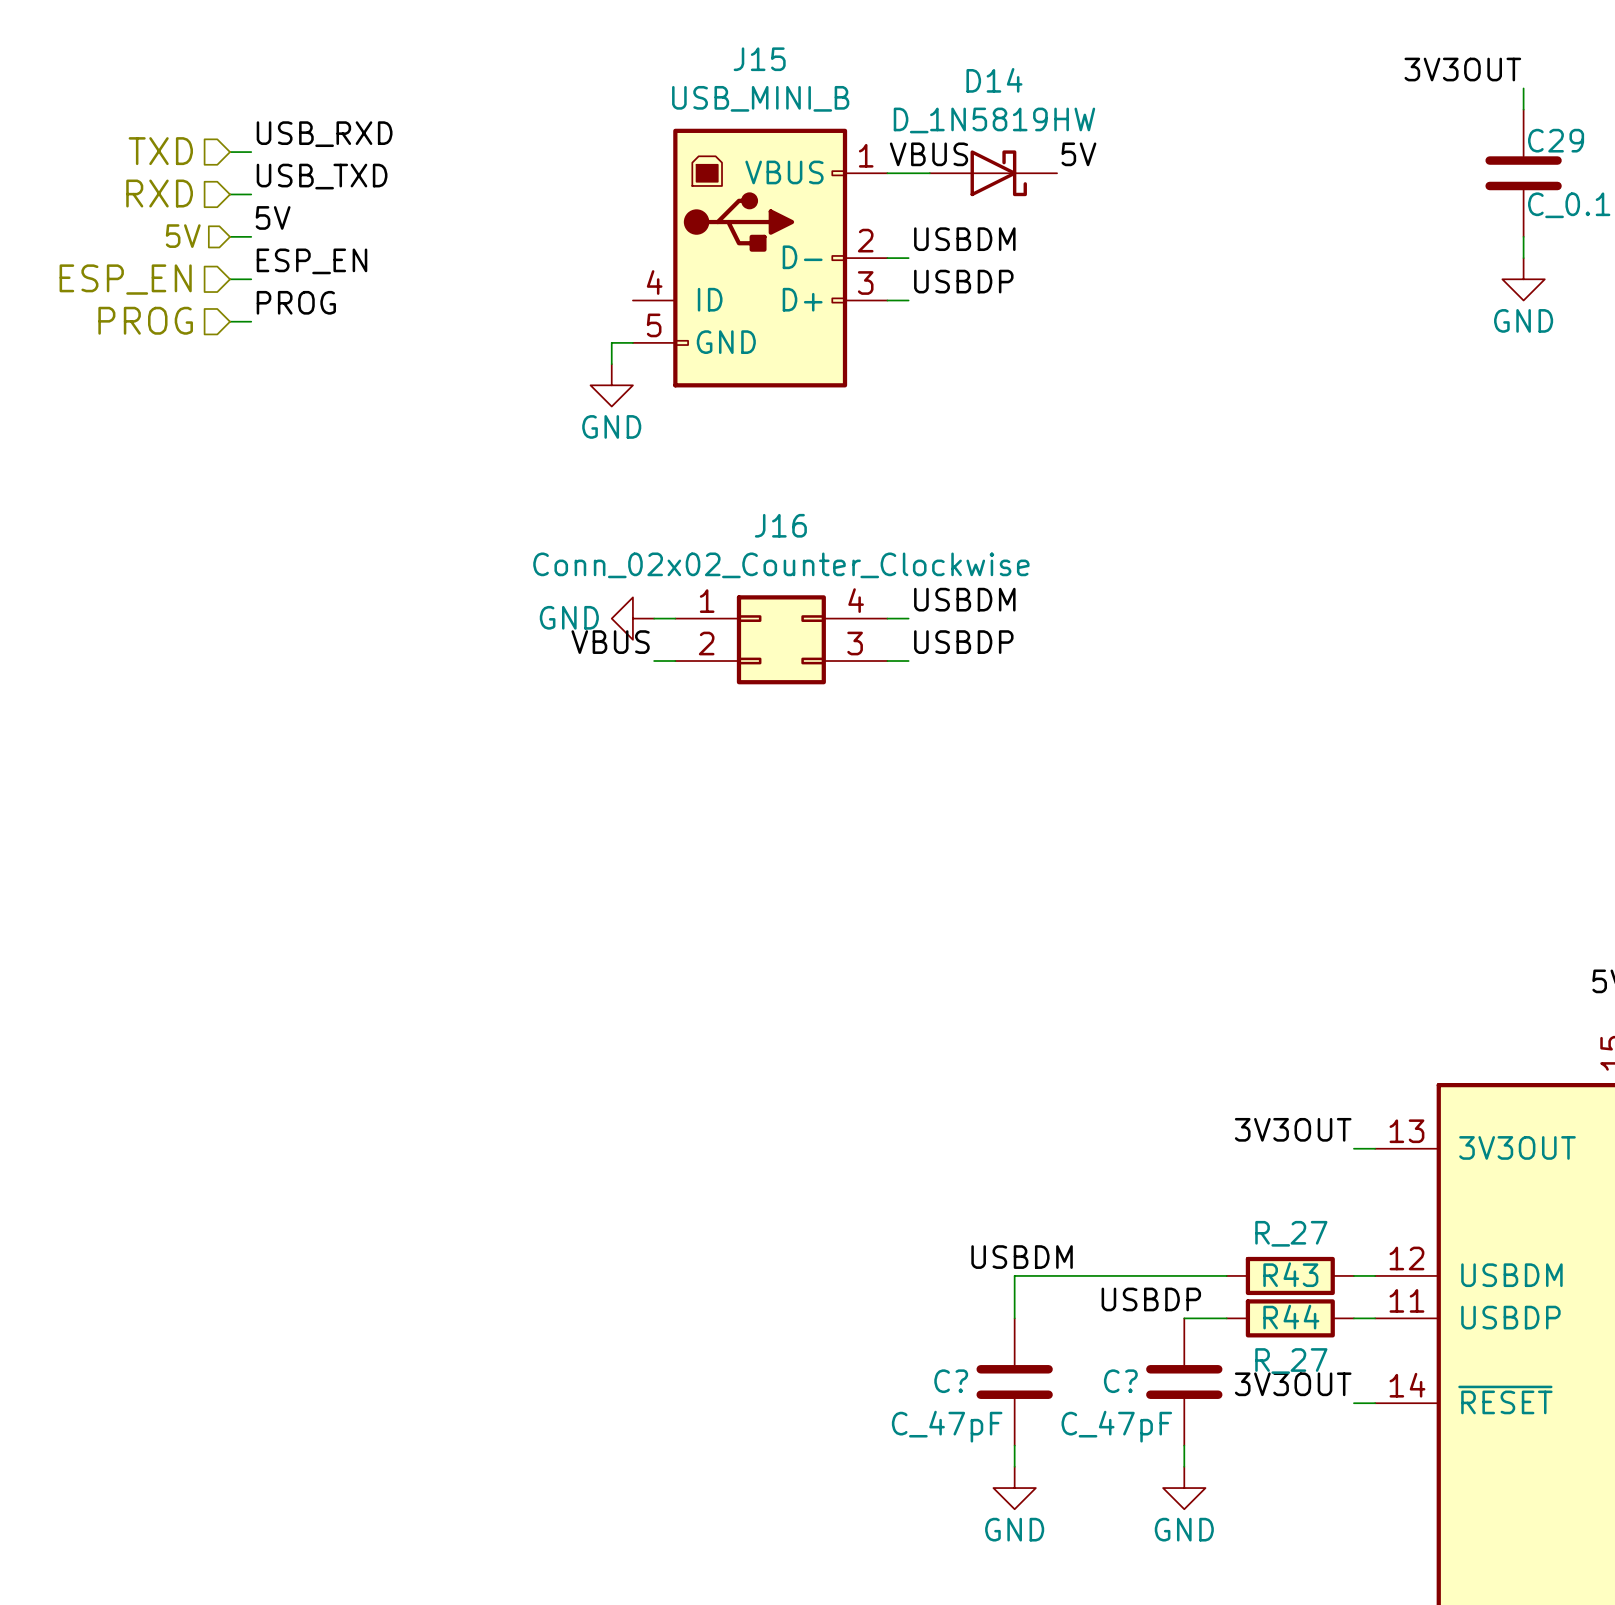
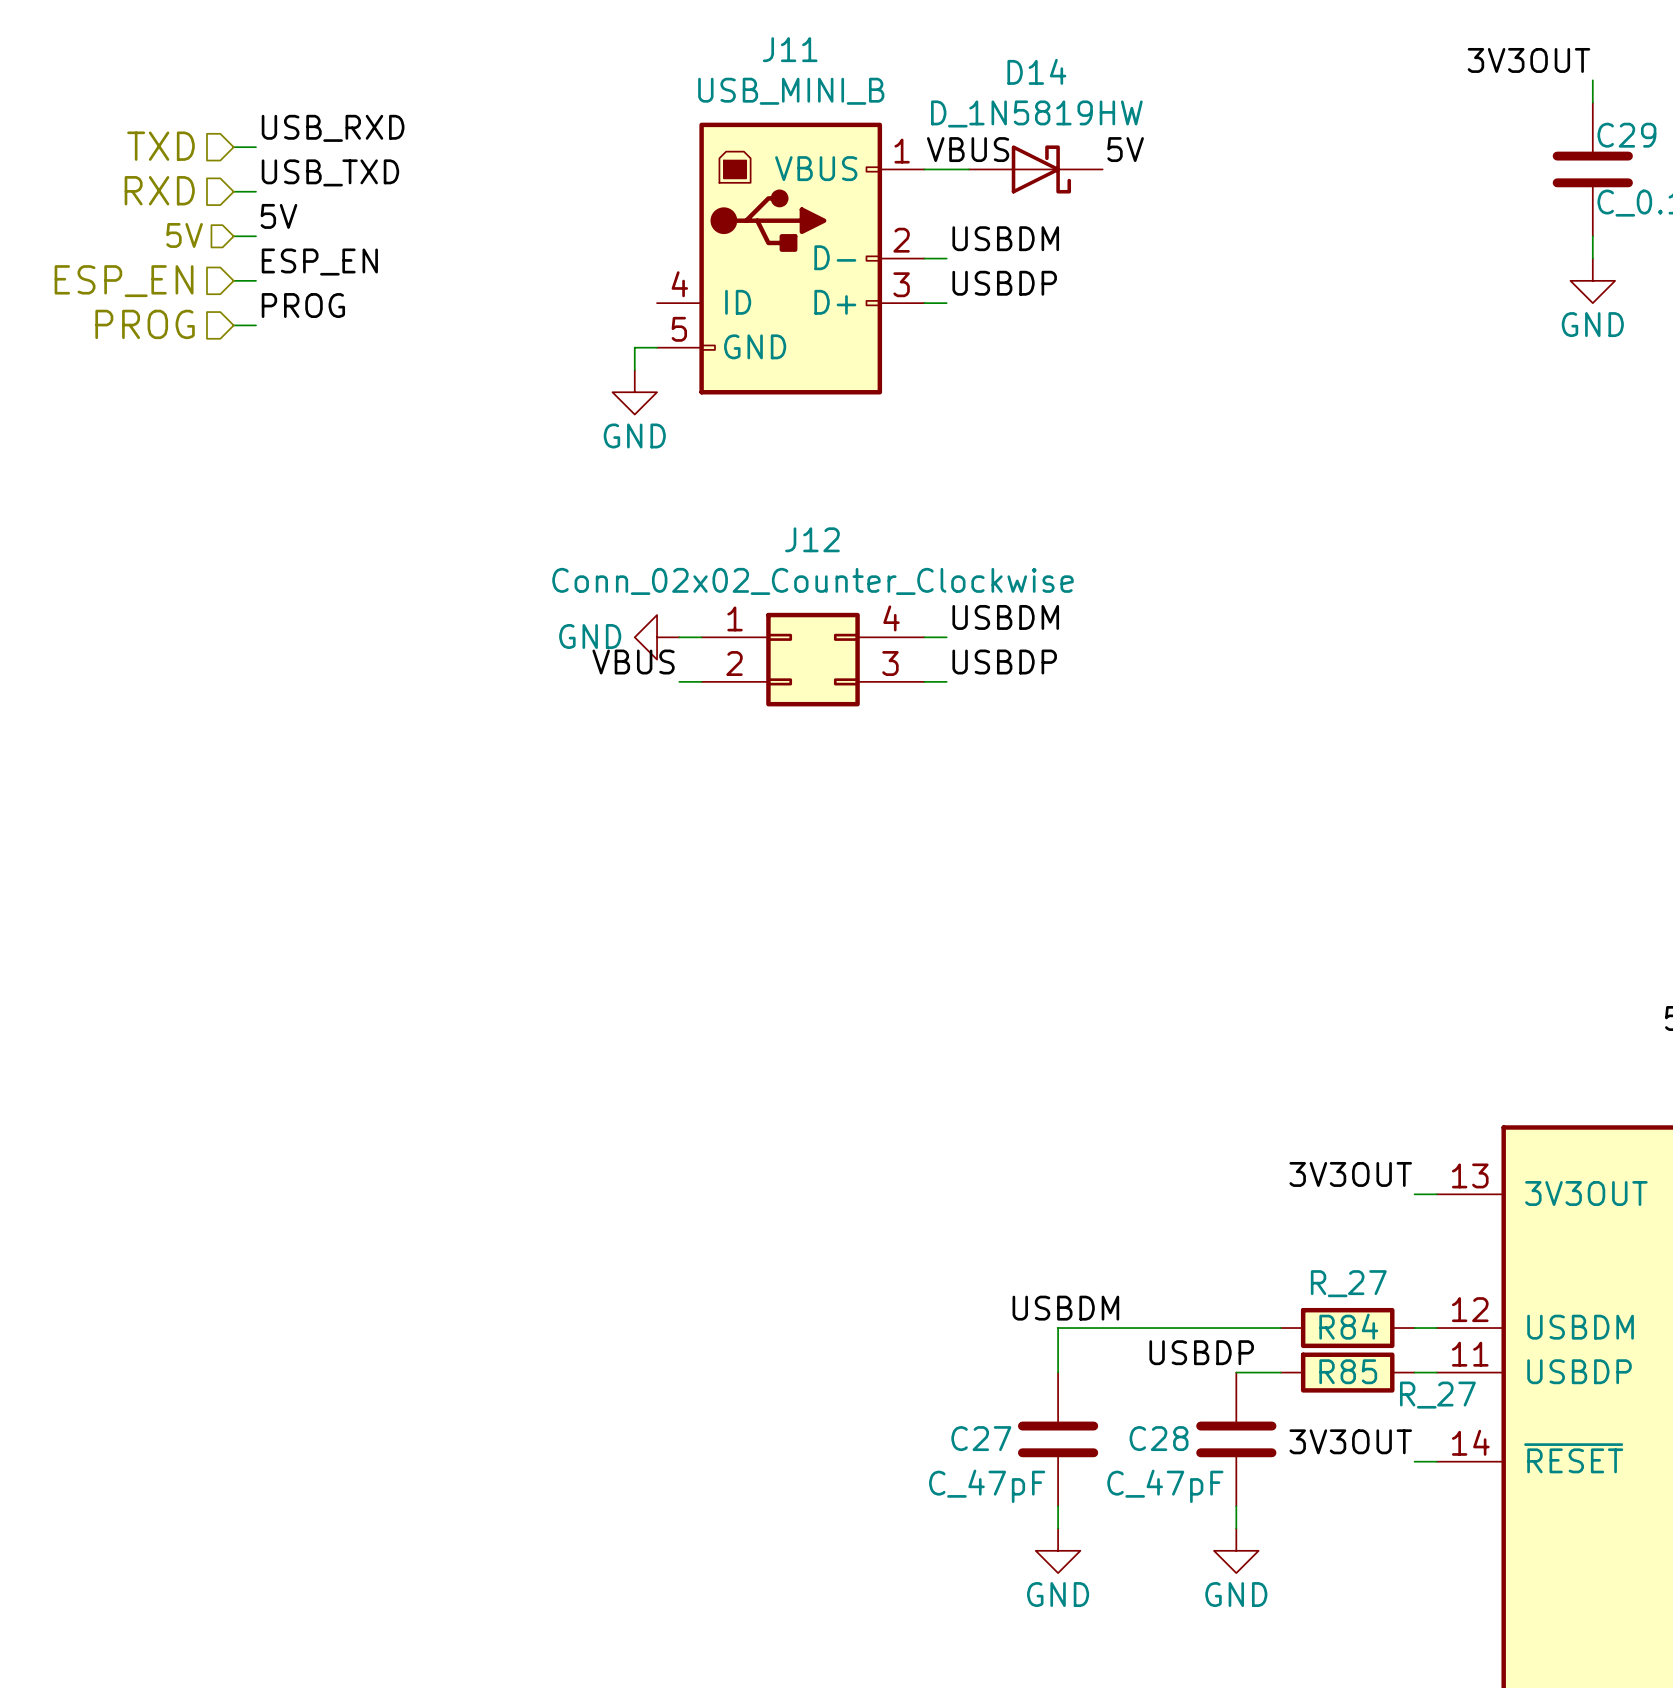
J15 name: J15 (759, 59) -> J11 (790, 49)
J16 name: J16 (780, 525) -> J12 (812, 539)
R43 name: R43 (1290, 1274) -> R84 (1348, 1326)
R44 name: R44 (1291, 1317) -> R85 (1348, 1371)
R44 value position: R_27 (1291, 1361) -> R_27 (1437, 1395)
C? name: C? (951, 1381) -> C27 (981, 1438)
C? name: C? (1120, 1381) -> C28 (1159, 1438)

